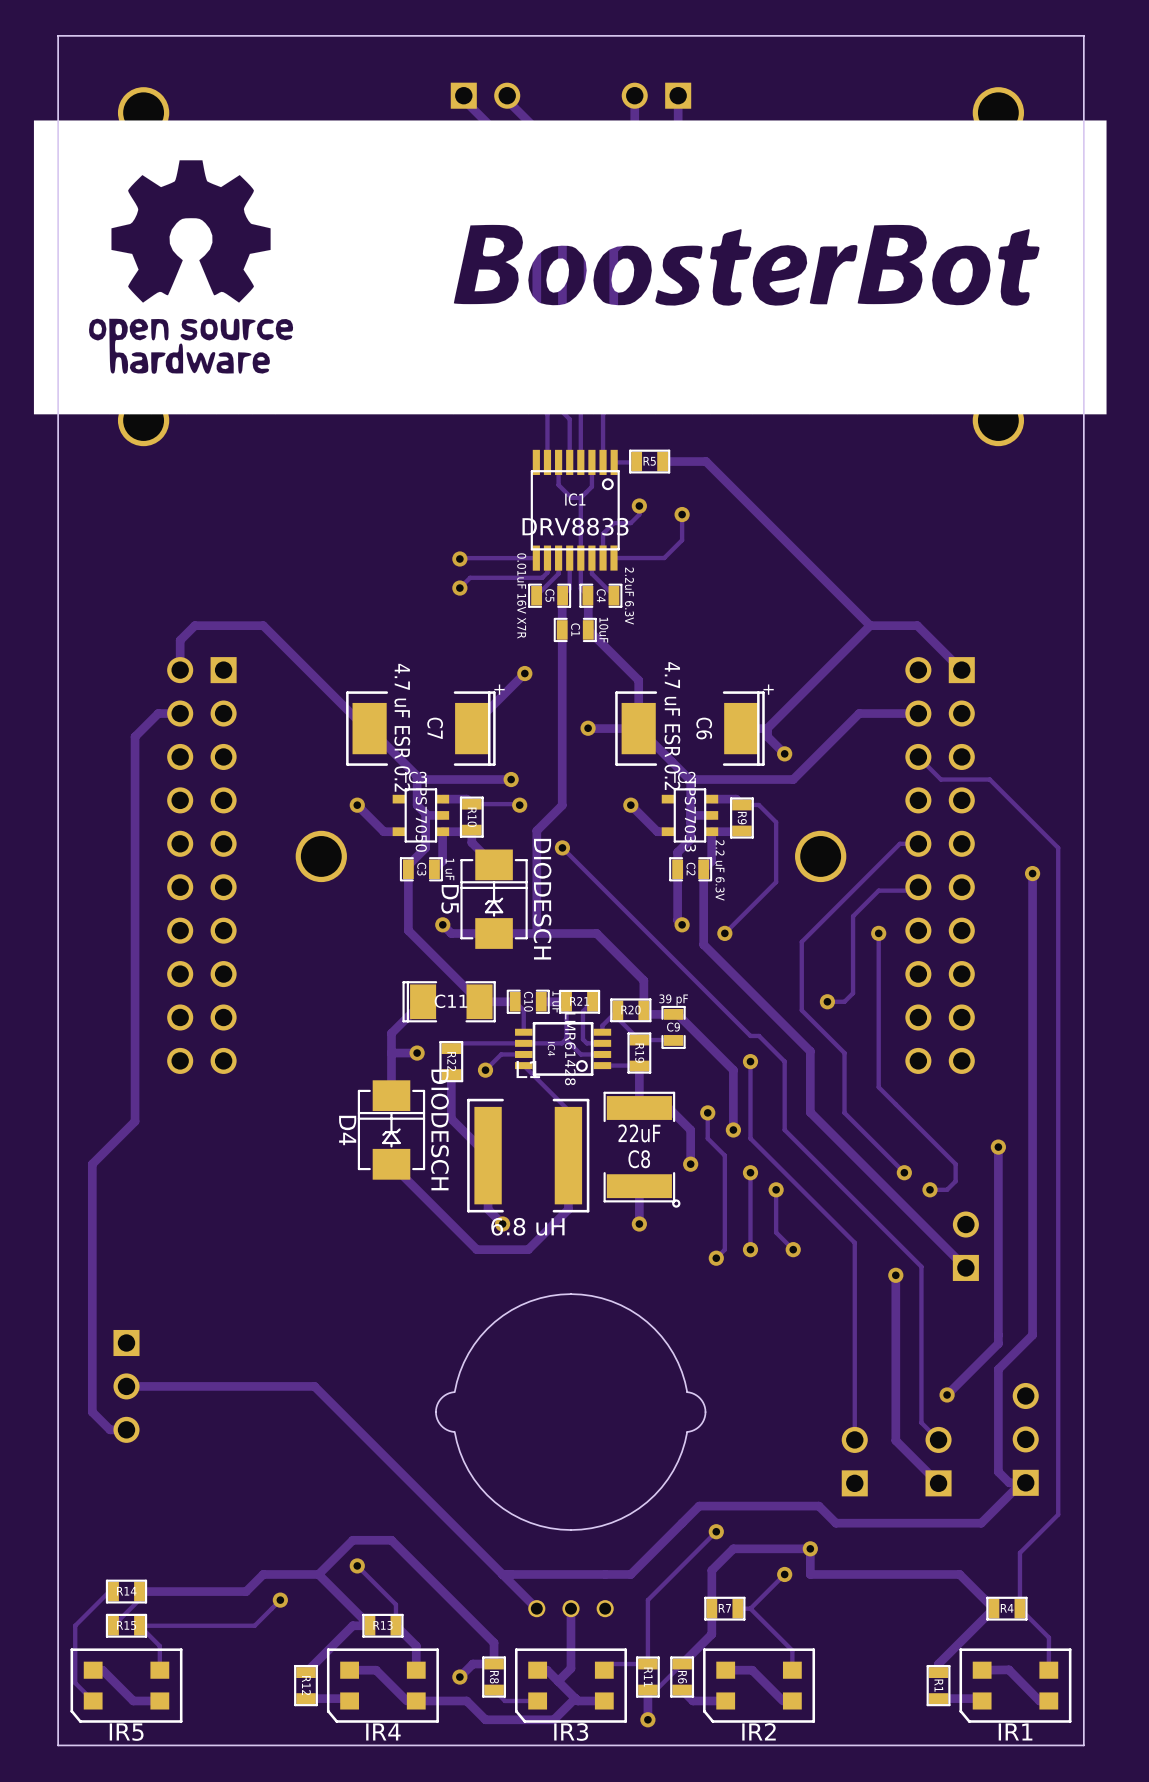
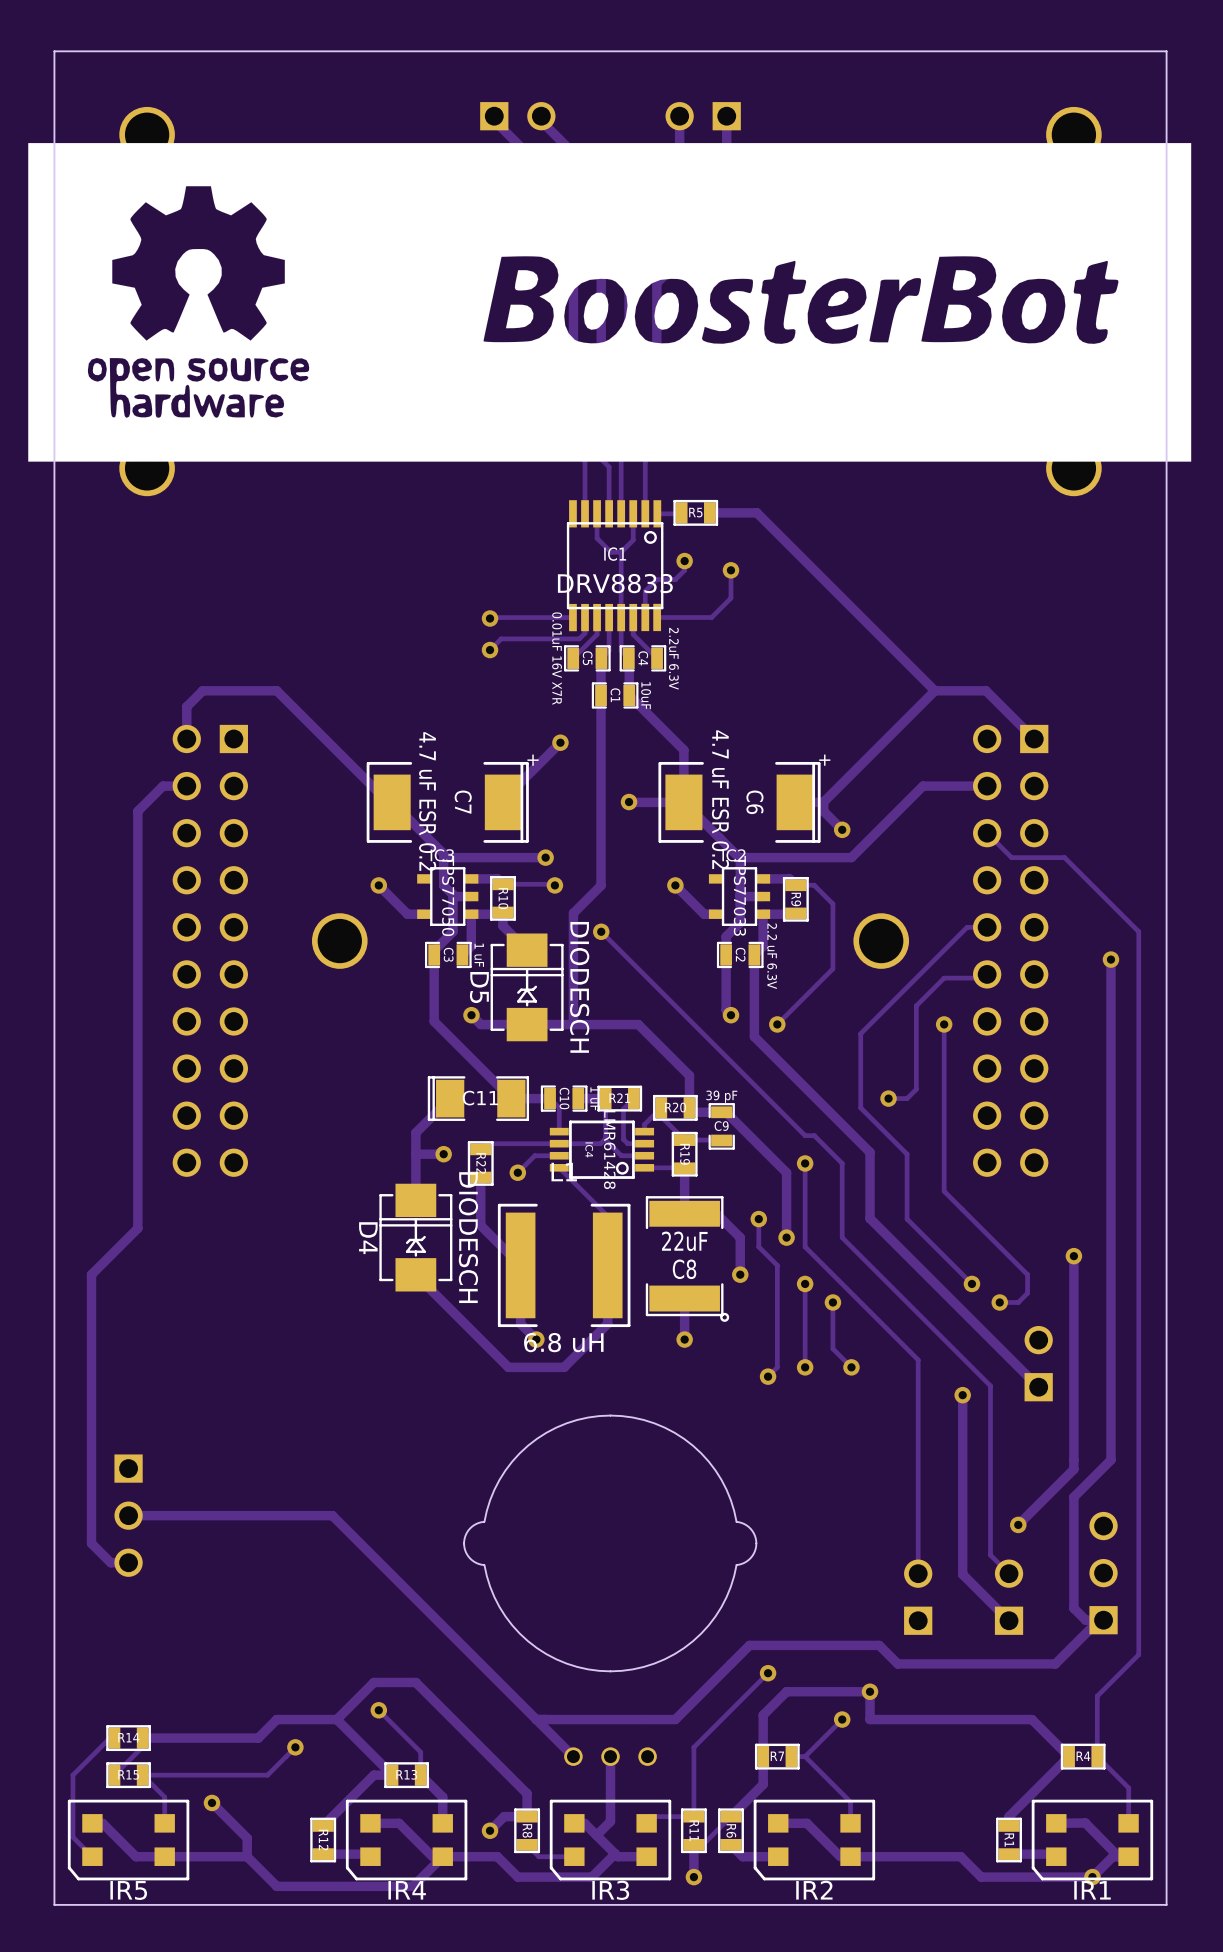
track: none -> (211, 1802) (247, 1838) (247, 1856)
via: none -> (211, 1802)
track: none -> (247, 1856) (164, 1856)
track: none -> (442, 1856) (413, 1886) (276, 1886) (247, 1856)
track: none -> (1118, 1856) (1112, 1856) (1092, 1877) (981, 1877) (960, 1856) (850, 1856)
via: none -> (1092, 1877)

